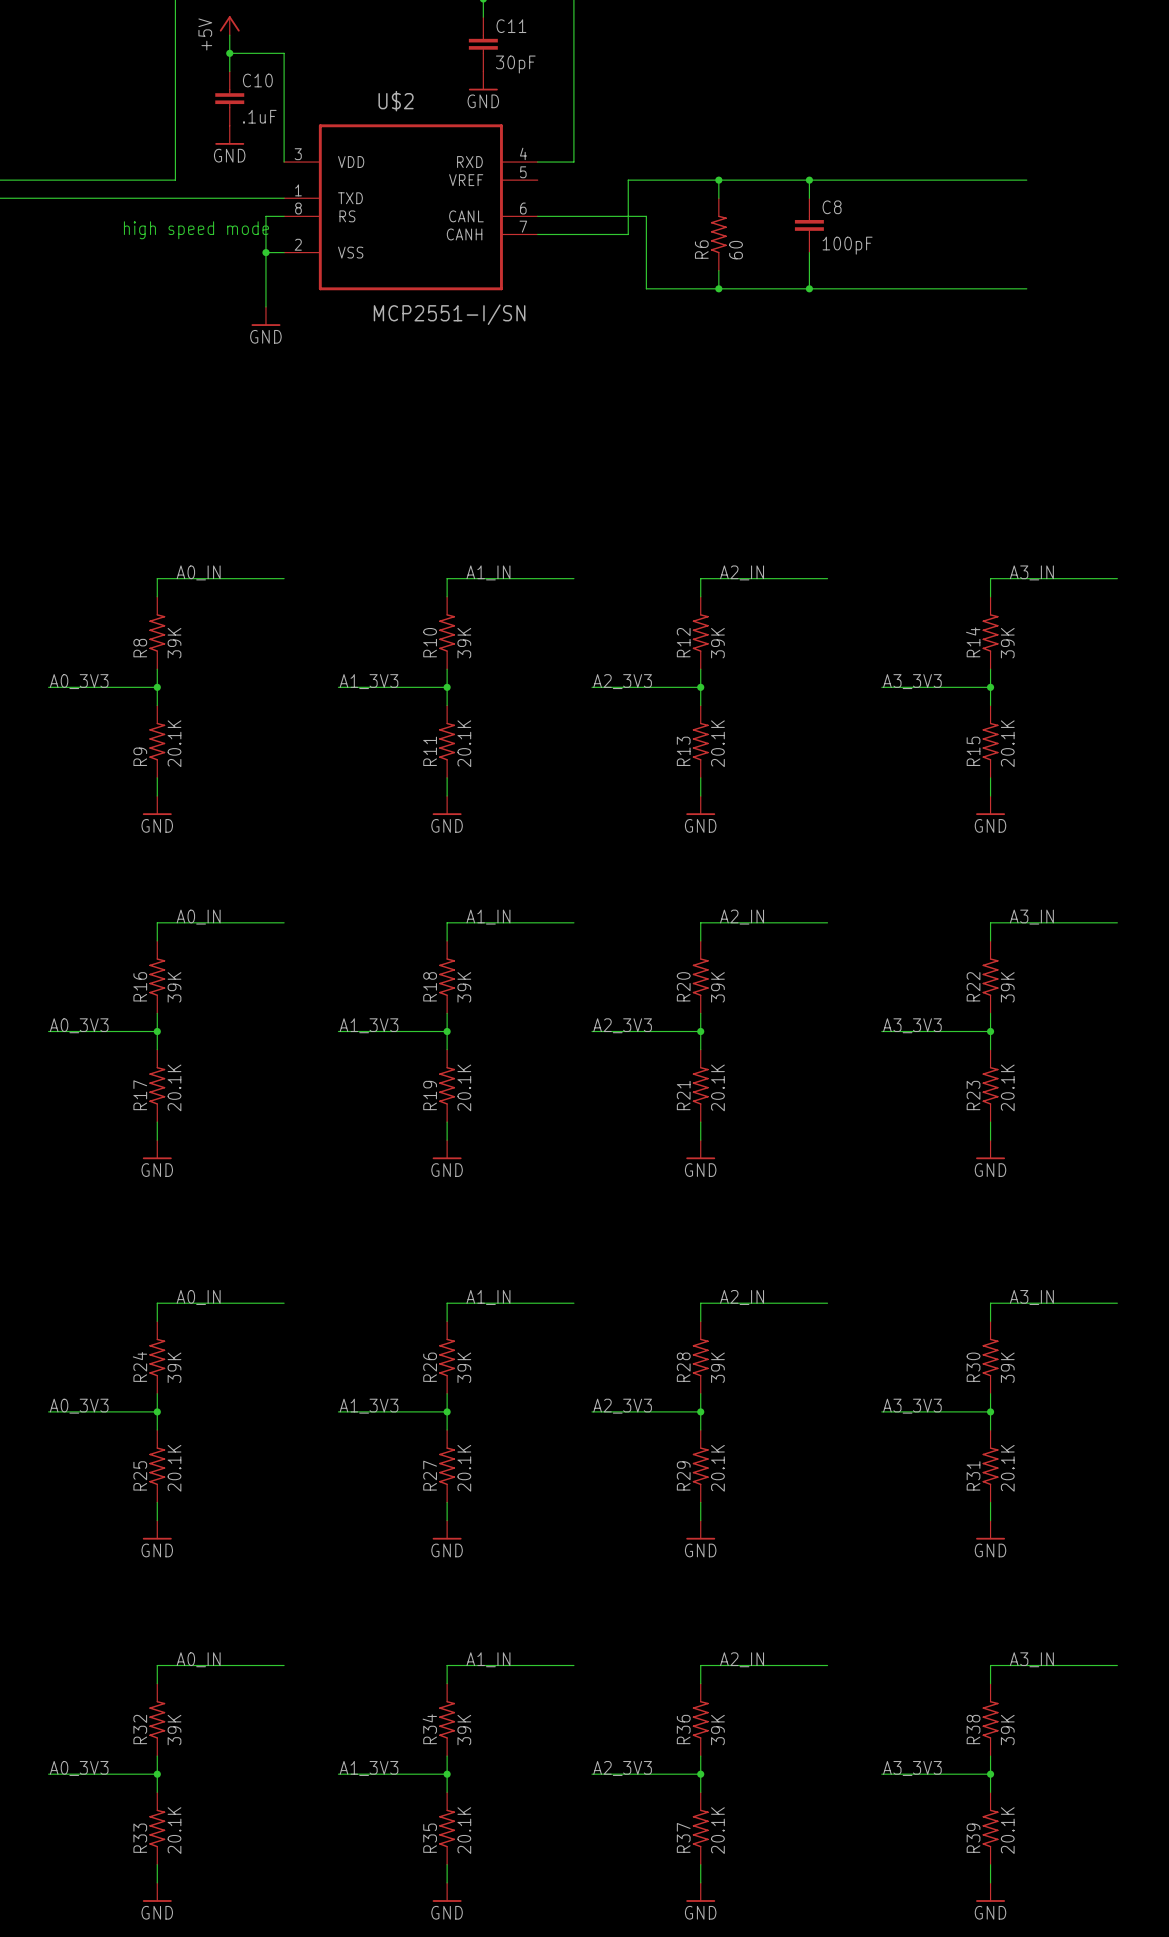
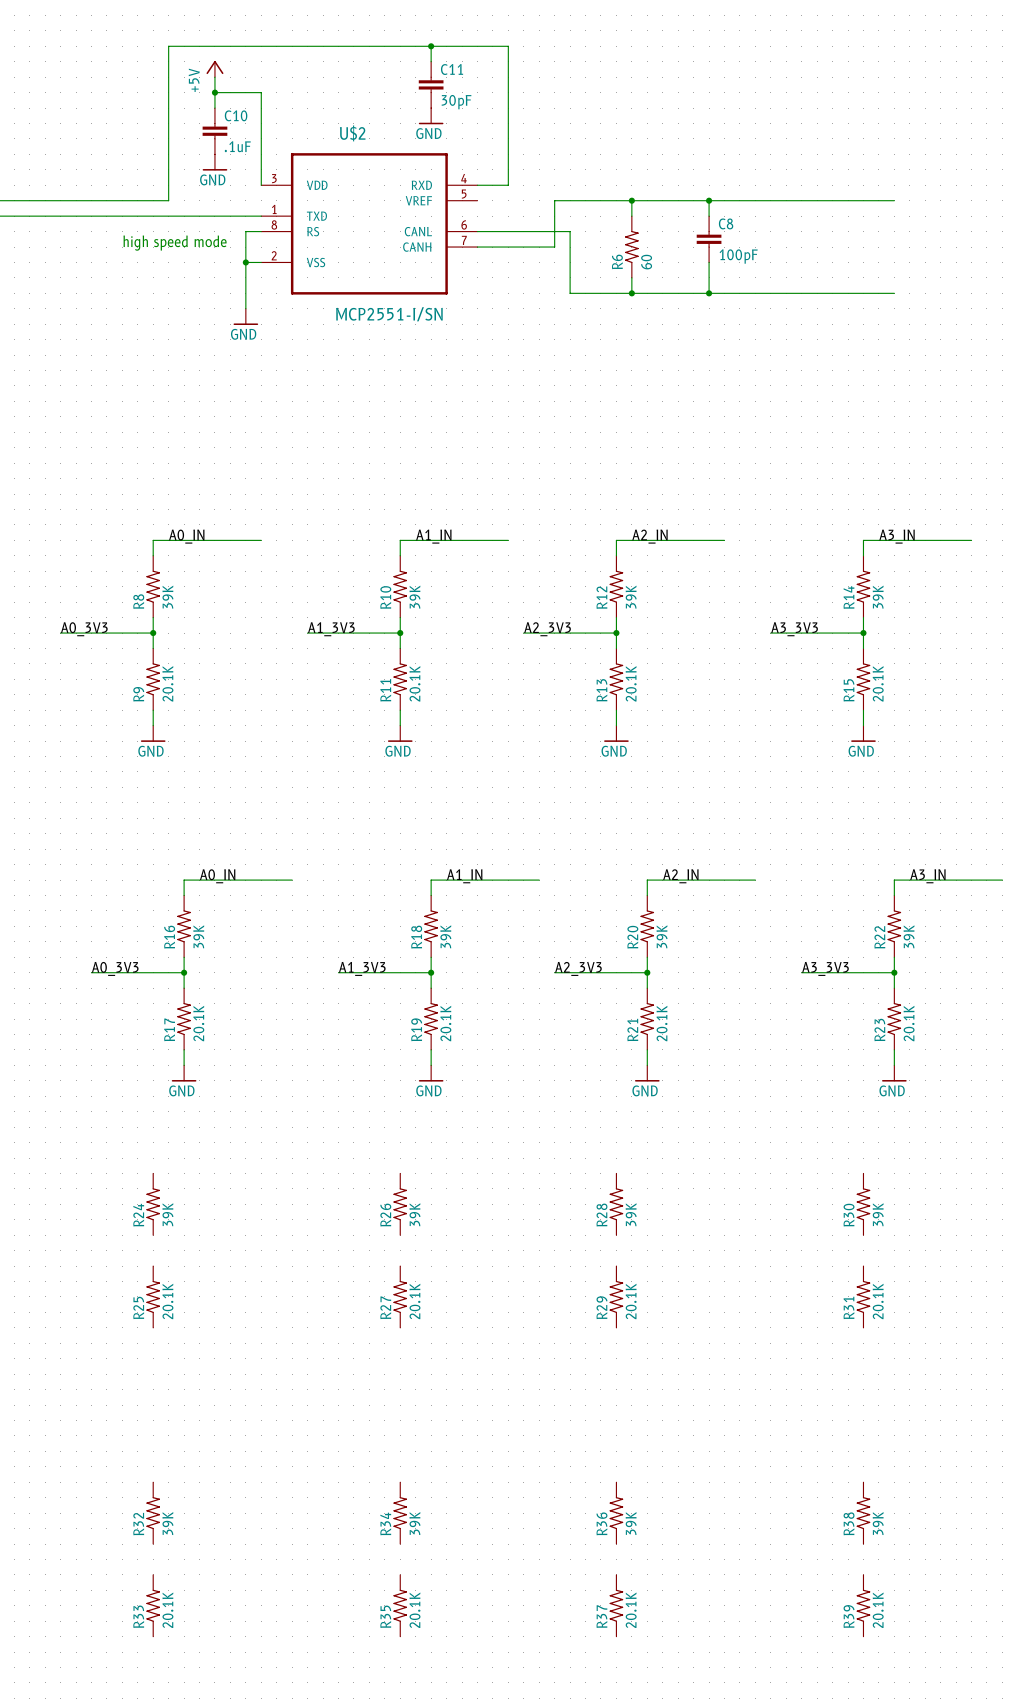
label position: A0_IN (198, 917) -> A0_IN (217, 876)
label position: A1_IN (488, 917) -> A1_IN (464, 876)
label position: A2_IN (742, 917) -> A2_IN (680, 876)
label position: A3_IN (1031, 917) -> A3_IN (927, 876)
wire: (284, 922) (157, 922) (157, 940) -> (292, 880) (184, 880) (184, 895)
wire: (573, 922) (447, 922) (447, 940) -> (539, 880) (431, 880) (431, 895)
wire: (827, 922) (700, 922) (700, 940) -> (755, 880) (647, 880) (647, 895)
wire: (1117, 922) (990, 922) (990, 940) -> (1002, 880) (894, 880) (894, 895)
R16 position: (157, 977) -> (184, 926)
R18 position: (447, 977) -> (431, 926)
R20 position: (700, 977) -> (647, 926)
R22 position: (990, 977) -> (894, 926)
wire: (157, 1013) (157, 1049) -> (184, 957) (184, 988)
wire: (447, 1013) (447, 1049) -> (431, 957) (431, 988)
wire: (700, 1013) (700, 1049) -> (647, 957) (647, 988)
wire: (990, 1013) (990, 1049) -> (894, 957) (894, 988)
label position: A0_3V3 (79, 1025) -> A0_3V3 (115, 968)
label position: A1_3V3 (368, 1025) -> A1_3V3 (362, 968)
label position: A2_3V3 (622, 1025) -> A2_3V3 (578, 968)
label position: A3_3V3 (912, 1025) -> A3_3V3 (825, 968)
wire: (48, 1031) (157, 1031) -> (91, 972) (184, 972)
junction: (157, 1031) -> none
wire: (338, 1031) (447, 1031) -> (338, 972) (431, 972)
junction: (447, 1031) -> none
wire: (592, 1031) (700, 1031) -> (554, 972) (647, 972)
junction: (700, 1031) -> none
wire: (881, 1031) (990, 1031) -> (801, 972) (894, 972)
junction: (990, 1031) -> none
R17 position: (157, 1085) -> (184, 1019)
junction: none -> (184, 972)
R19 position: (447, 1085) -> (431, 1019)
junction: none -> (431, 972)
R21 position: (700, 1085) -> (647, 1019)
junction: none -> (647, 972)
R23 position: (990, 1085) -> (894, 1019)
junction: none -> (894, 972)
wire: (157, 1122) (157, 1140) -> (184, 1049) (184, 1065)
wire: (447, 1122) (447, 1140) -> (431, 1049) (431, 1065)
wire: (700, 1122) (700, 1140) -> (647, 1049) (647, 1065)
wire: (990, 1122) (990, 1140) -> (894, 1049) (894, 1065)
power symbol position: GND (157, 1149) -> GND (184, 1073)
power symbol position: GND (447, 1149) -> GND (431, 1073)
power symbol position: GND (700, 1149) -> GND (647, 1073)
power symbol position: GND (990, 1149) -> GND (894, 1073)
label: A0_IN (198, 1297) -> none
label: A1_IN (488, 1297) -> none
label: A2_IN (742, 1297) -> none
label: A3_IN (1031, 1297) -> none
wire: (284, 1303) (157, 1303) (157, 1321) -> none
wire: (573, 1303) (447, 1303) (447, 1321) -> none
wire: (827, 1303) (700, 1303) (700, 1321) -> none
wire: (1117, 1303) (990, 1303) (990, 1321) -> none
wire: (157, 1393) (157, 1430) -> none
wire: (447, 1393) (447, 1430) -> none
wire: (700, 1393) (700, 1430) -> none
wire: (990, 1393) (990, 1430) -> none
label: A0_3V3 (79, 1406) -> none
label: A1_3V3 (368, 1406) -> none
label: A2_3V3 (622, 1406) -> none
label: A3_3V3 (912, 1406) -> none
wire: (48, 1411) (157, 1411) -> none
junction: (157, 1411) -> none
wire: (338, 1411) (447, 1411) -> none
junction: (447, 1411) -> none
wire: (592, 1411) (700, 1411) -> none
junction: (700, 1411) -> none
wire: (881, 1411) (990, 1411) -> none
junction: (990, 1411) -> none
wire: (157, 1502) (157, 1520) -> none
wire: (447, 1502) (447, 1520) -> none
wire: (700, 1502) (700, 1520) -> none
wire: (990, 1502) (990, 1520) -> none
power symbol: GND (157, 1530) -> none
power symbol: GND (447, 1530) -> none
power symbol: GND (700, 1530) -> none
power symbol: GND (990, 1530) -> none
label: A0_IN (198, 1659) -> none
label: A1_IN (488, 1659) -> none
label: A2_IN (742, 1659) -> none
label: A3_IN (1031, 1659) -> none
wire: (284, 1665) (157, 1665) (157, 1683) -> none
wire: (573, 1665) (447, 1665) (447, 1683) -> none
wire: (827, 1665) (700, 1665) (700, 1683) -> none
wire: (1117, 1665) (990, 1665) (990, 1683) -> none
wire: (157, 1756) (157, 1792) -> none
wire: (447, 1756) (447, 1792) -> none
wire: (700, 1756) (700, 1792) -> none
wire: (990, 1756) (990, 1792) -> none
label: A0_3V3 (79, 1768) -> none
label: A1_3V3 (368, 1768) -> none
label: A2_3V3 (622, 1768) -> none
label: A3_3V3 (912, 1768) -> none
wire: (48, 1774) (157, 1774) -> none
junction: (157, 1774) -> none
wire: (338, 1774) (447, 1774) -> none
junction: (447, 1774) -> none
wire: (592, 1774) (700, 1774) -> none
junction: (700, 1774) -> none
wire: (881, 1774) (990, 1774) -> none
junction: (990, 1774) -> none
wire: (157, 1864) (157, 1882) -> none
wire: (447, 1864) (447, 1882) -> none
wire: (700, 1864) (700, 1882) -> none
wire: (990, 1864) (990, 1882) -> none
power symbol: GND (157, 1892) -> none
power symbol: GND (447, 1892) -> none
power symbol: GND (700, 1892) -> none
power symbol: GND (990, 1892) -> none

